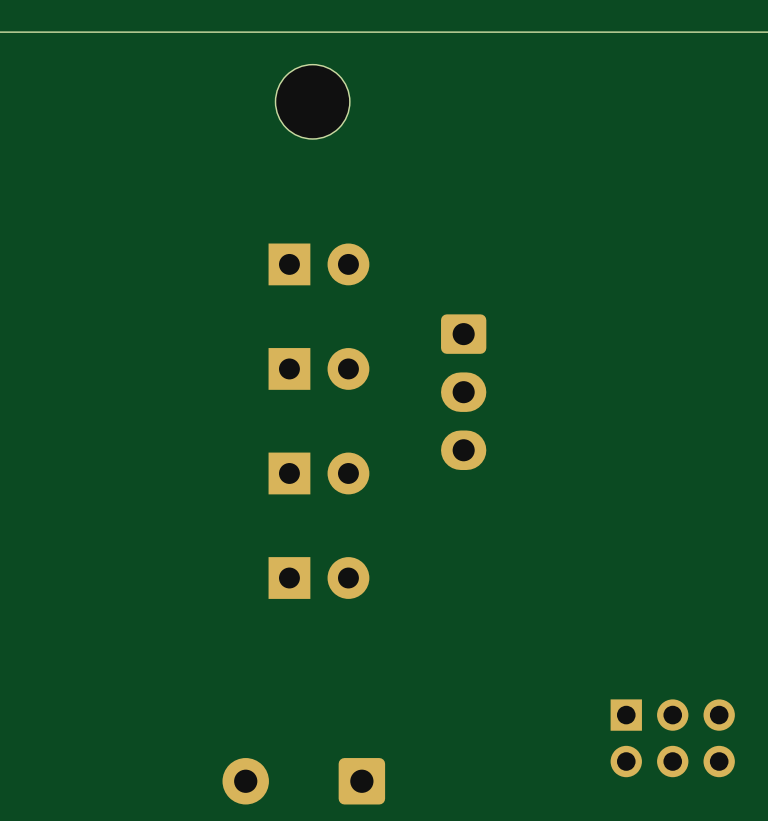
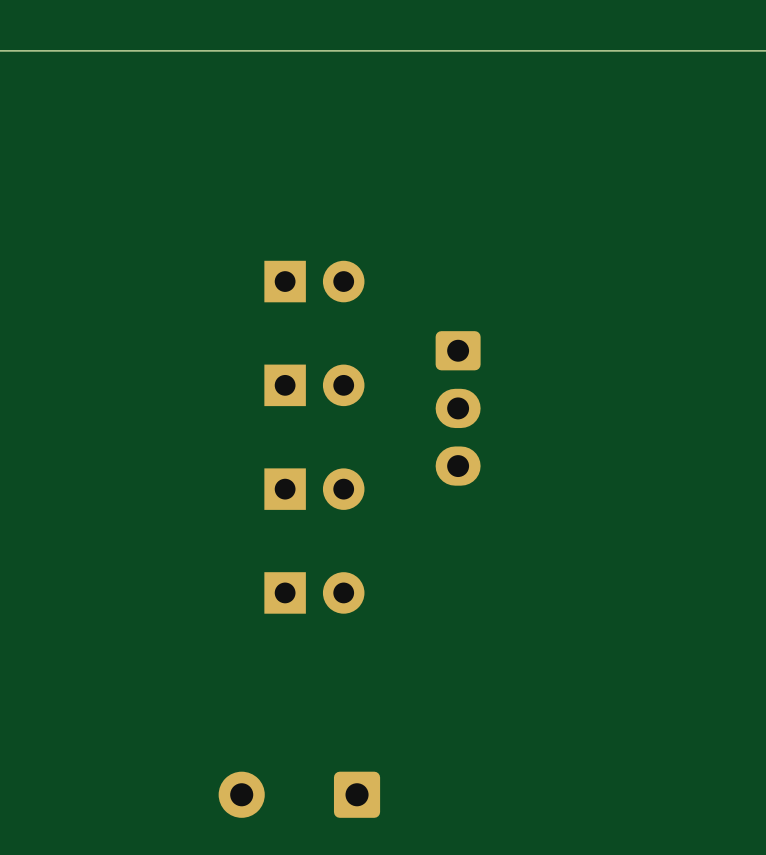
part: (312, 101) -> none
part: (672, 738) -> none

